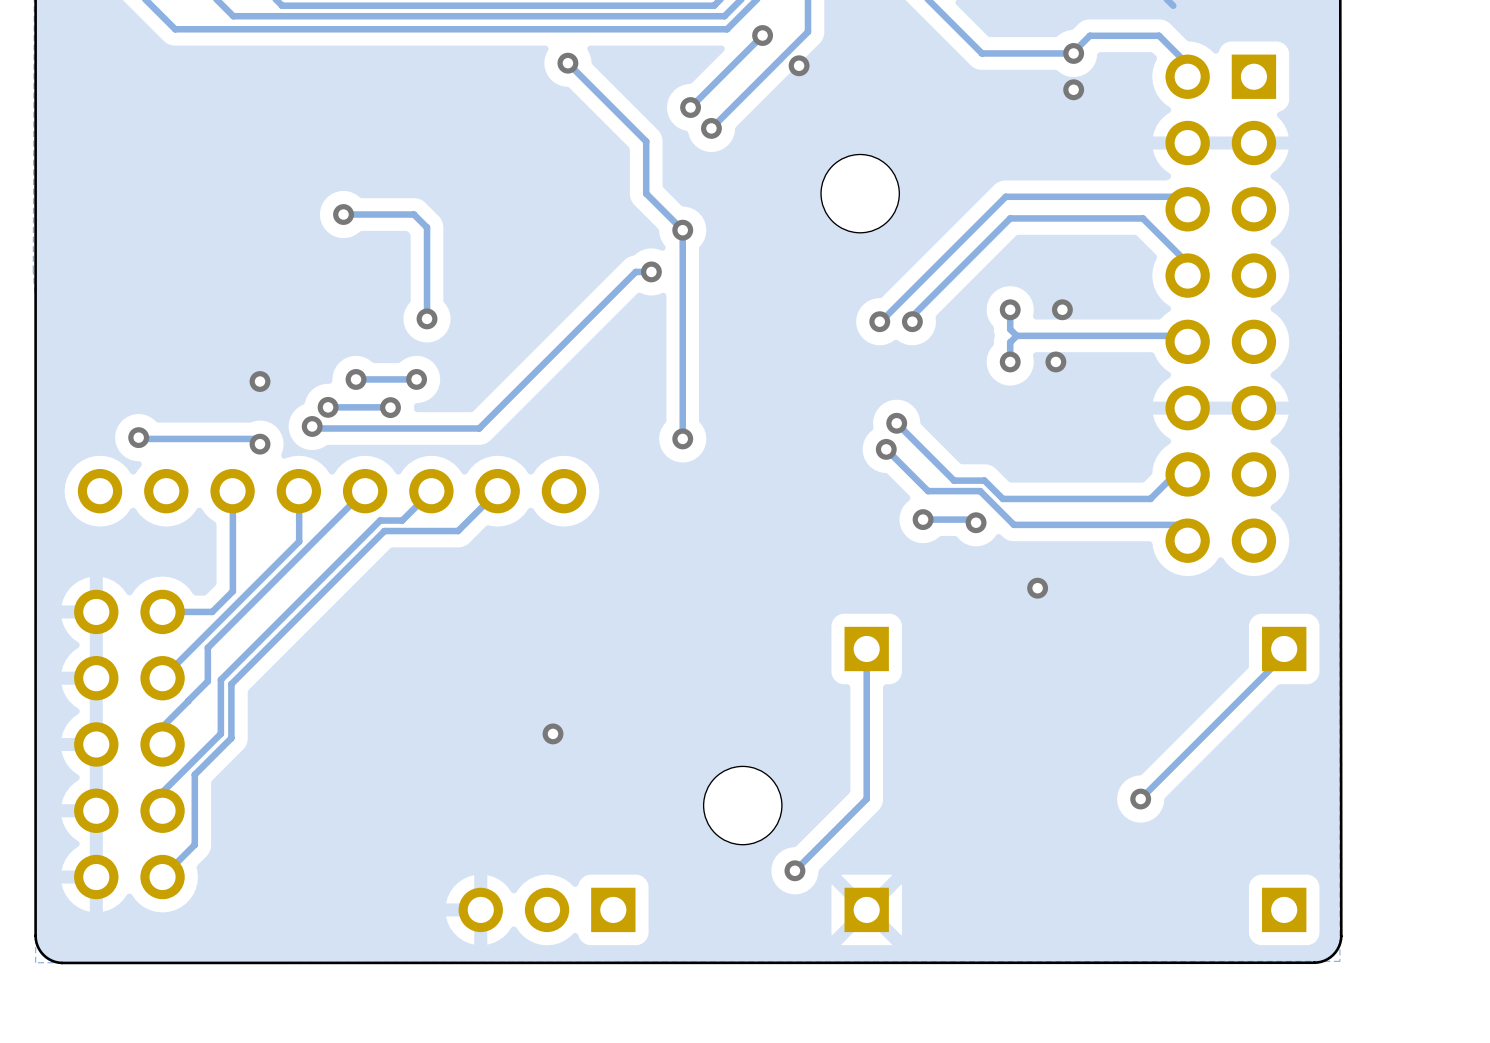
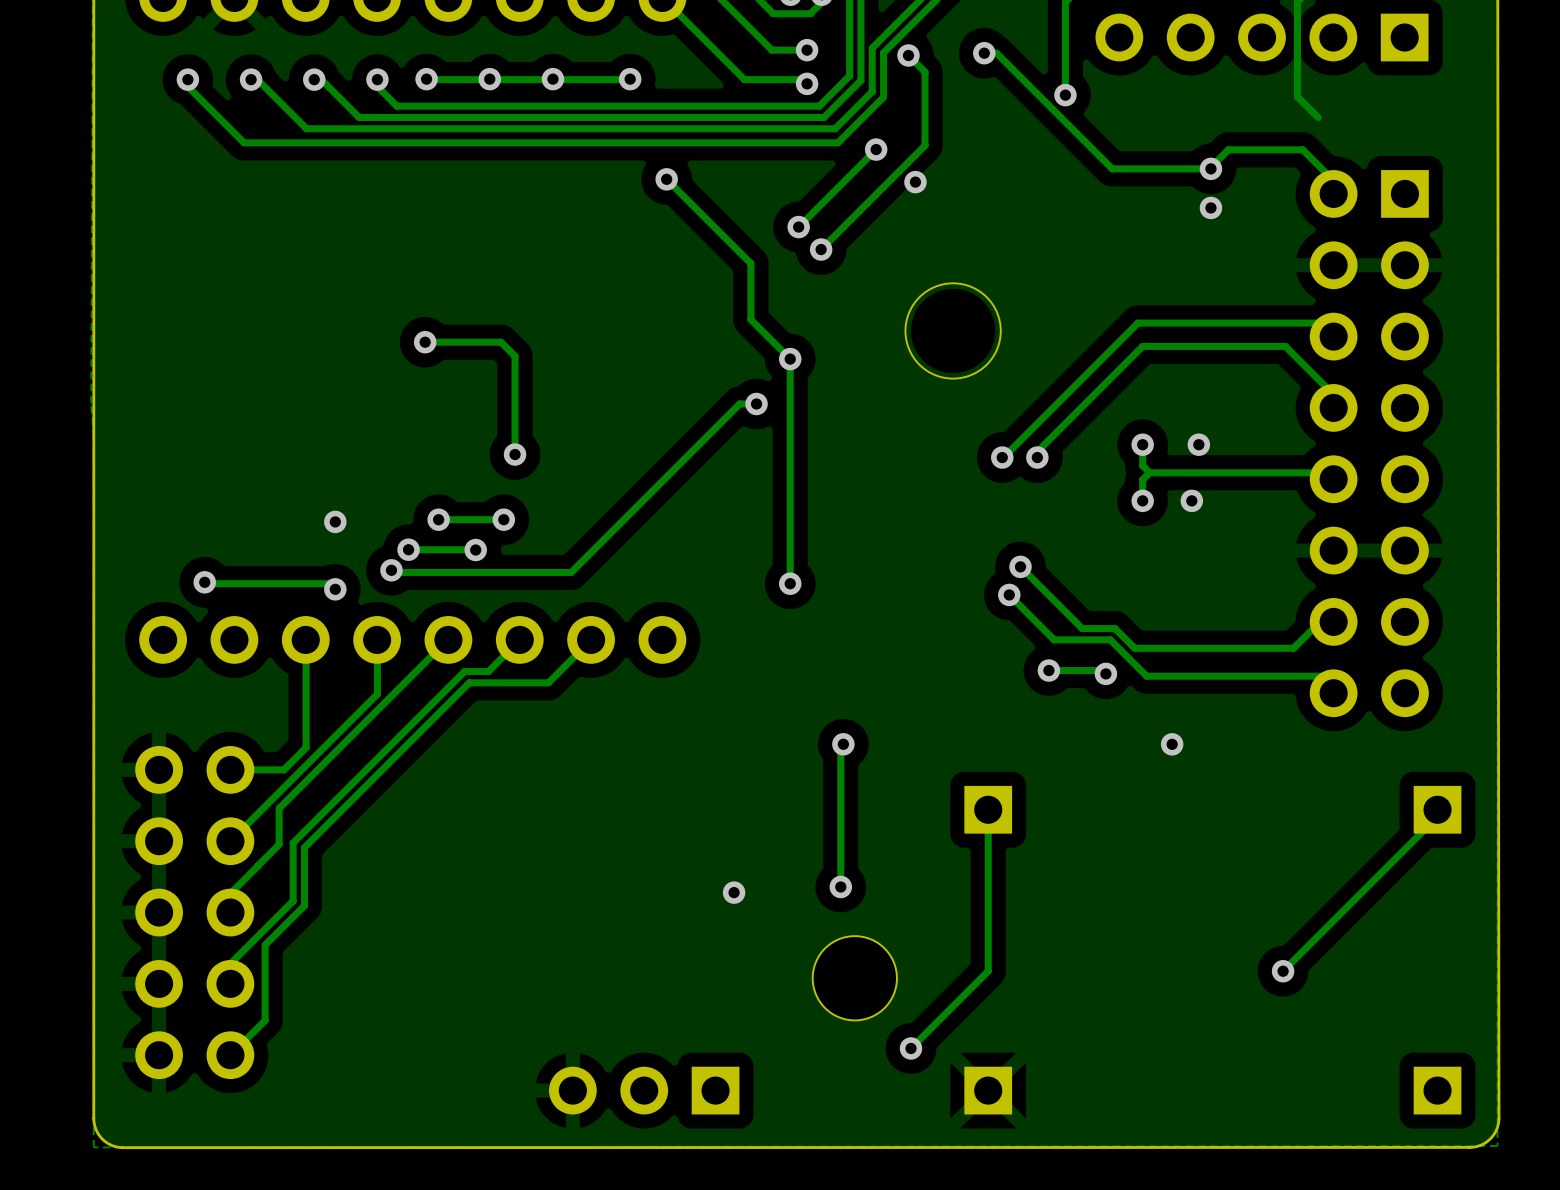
round board edge: [820, 153, 900, 234] -> none
round board edge: none -> [904, 282, 1002, 380]
track: none -> (843, 744) (840, 746) (840, 887)
via: none -> (843, 744)
via: none -> (840, 887)
via position: (553, 733) -> (734, 892)

